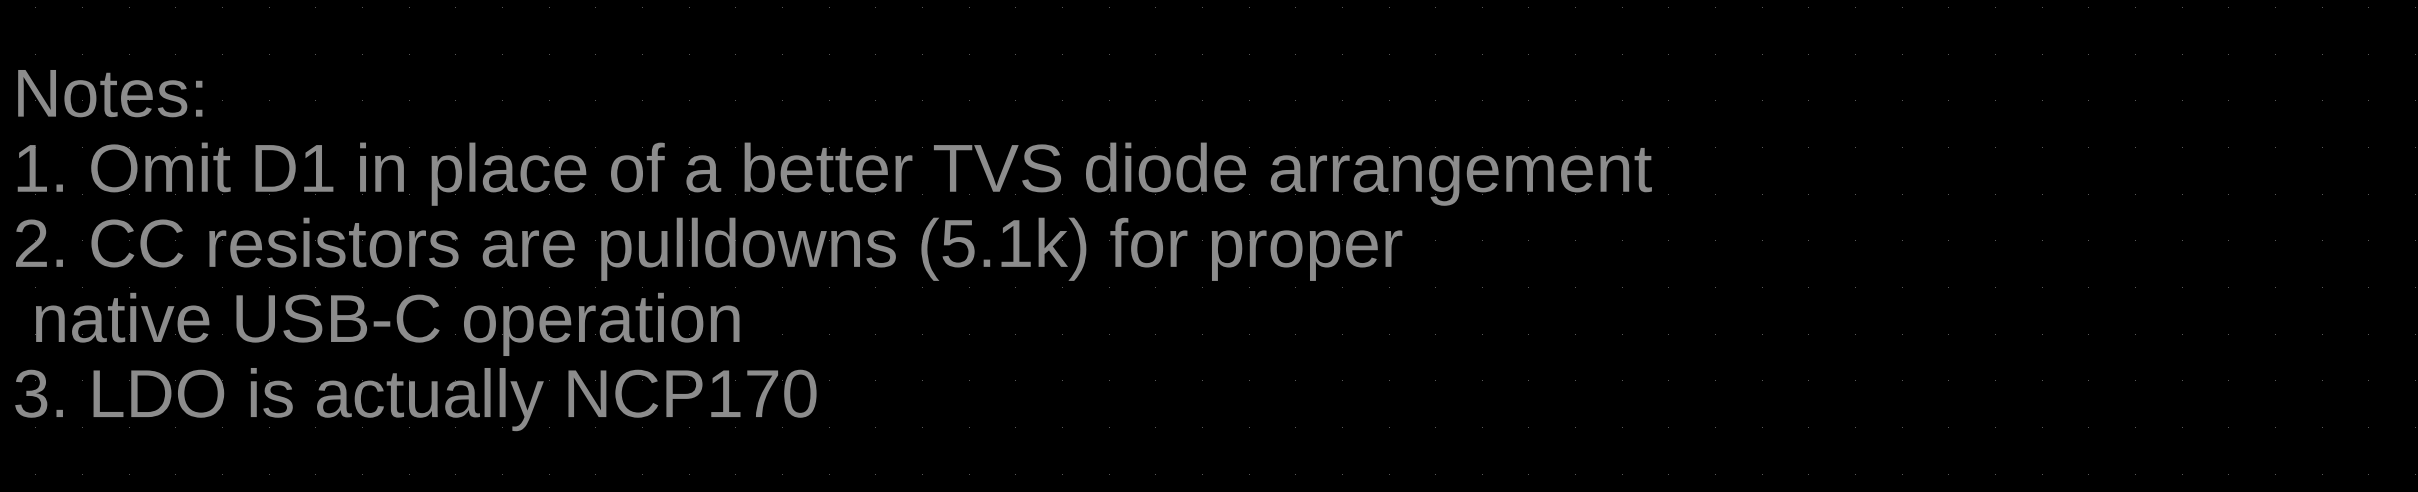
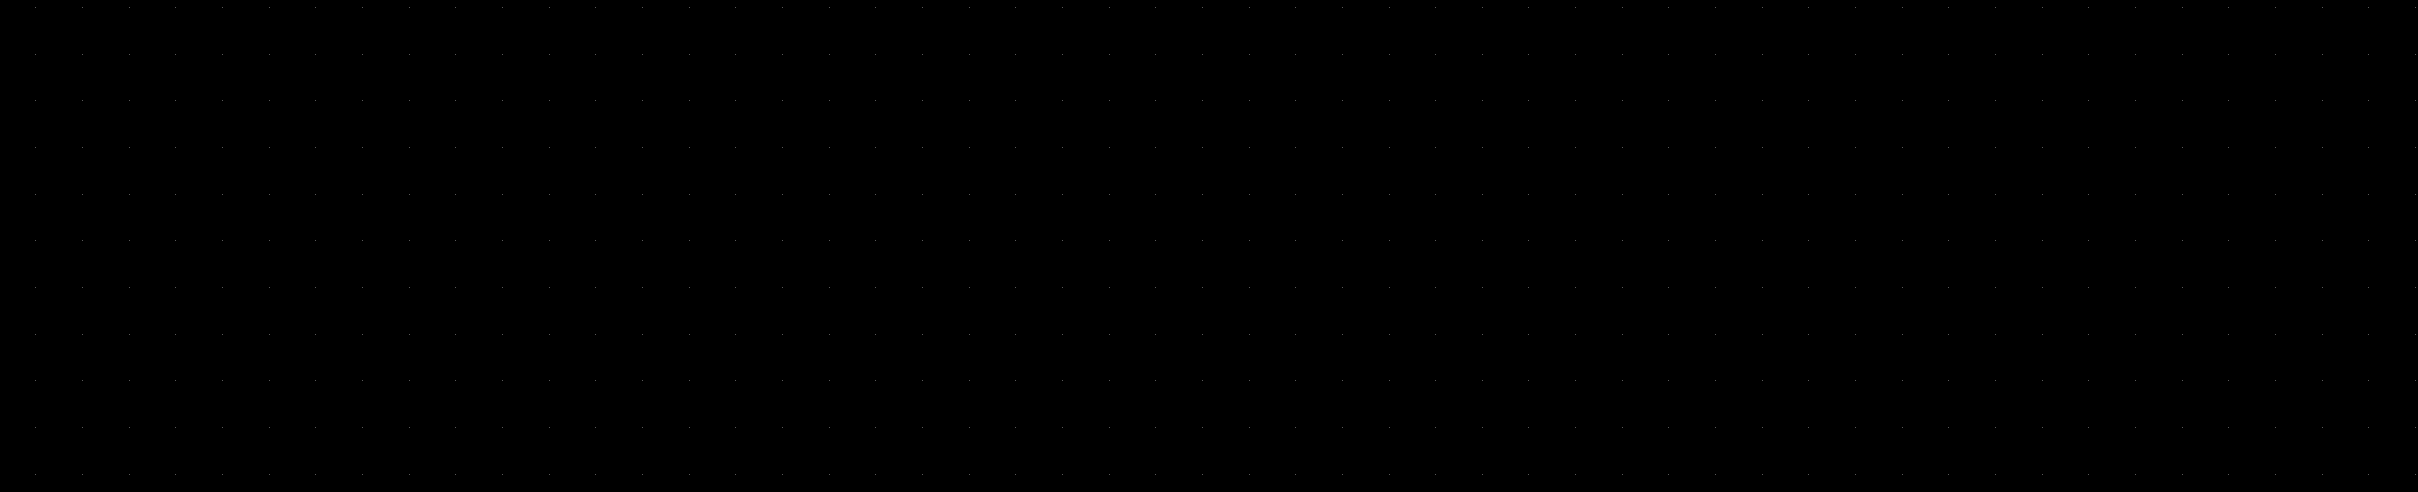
text: Notes: (110, 93) -> none
text: 1. Omit D1 in place of a better TVS diode arrangement (834, 174) -> none
text: 2. CC resistors are pulldowns (5.1k) for proper (709, 249) -> none
text: native USB-C operation (387, 324) -> none
text: 3. LDO is actually NCP170 (415, 399) -> none

